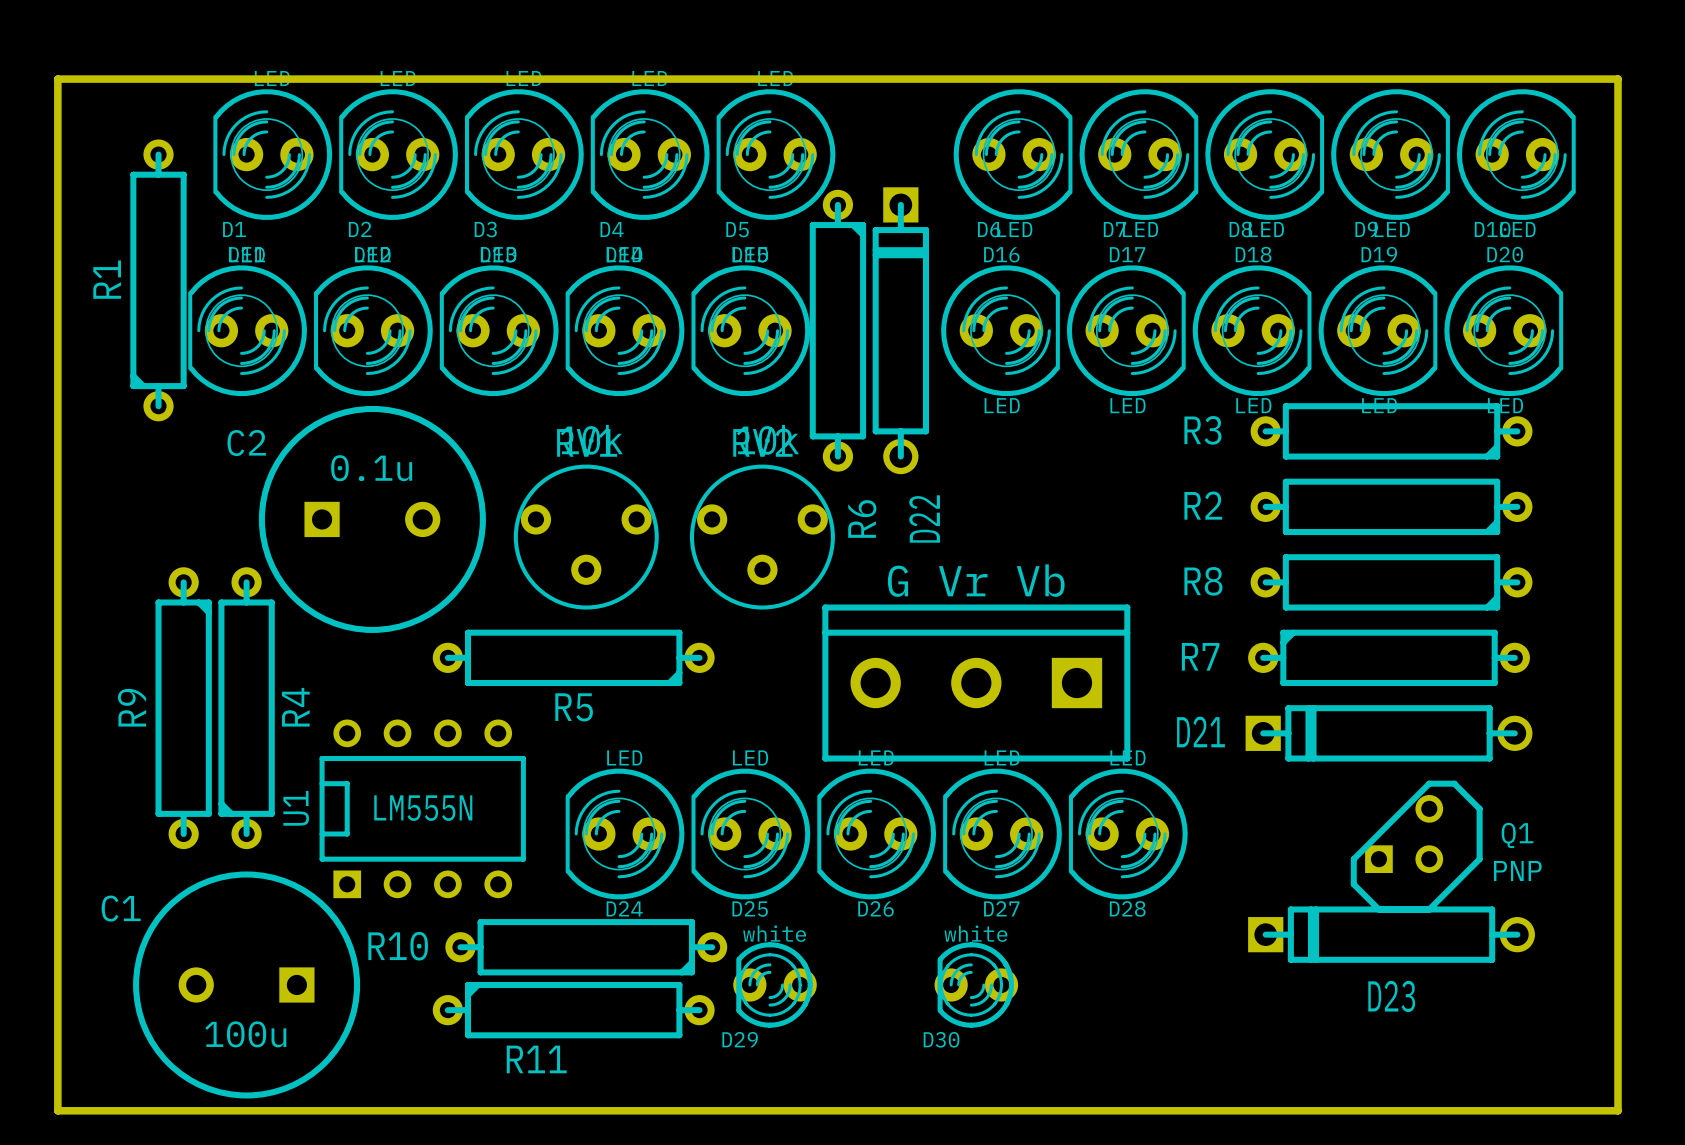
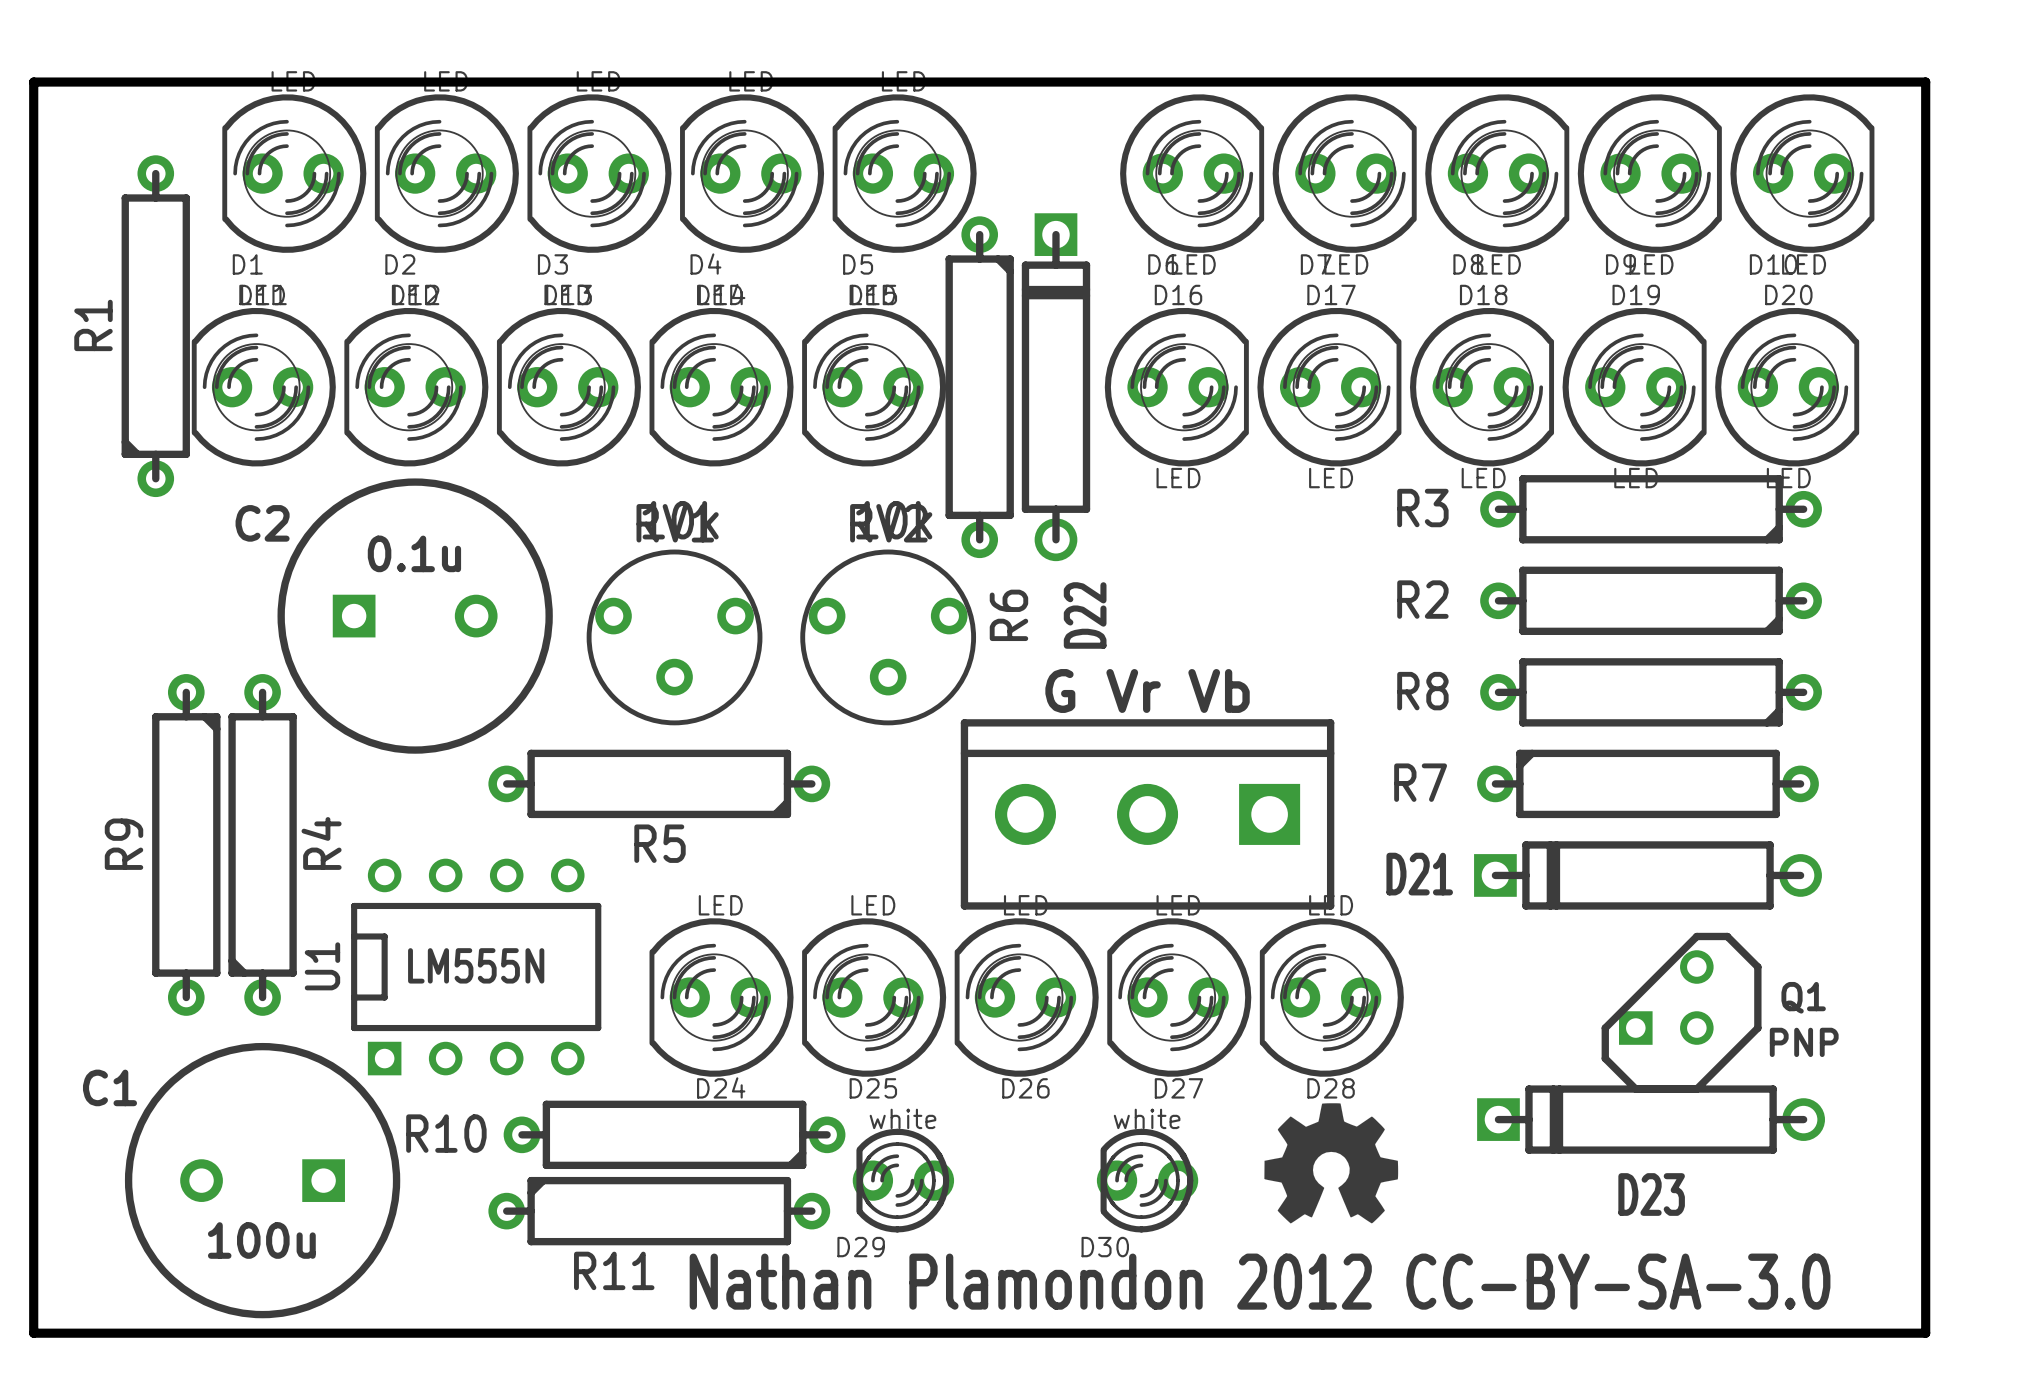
drawing: none -> [1264, 1103, 1399, 1224]
text: none -> Nathan Plamondon 2012 CC-BY-SA-3.0 (1260, 1281)

